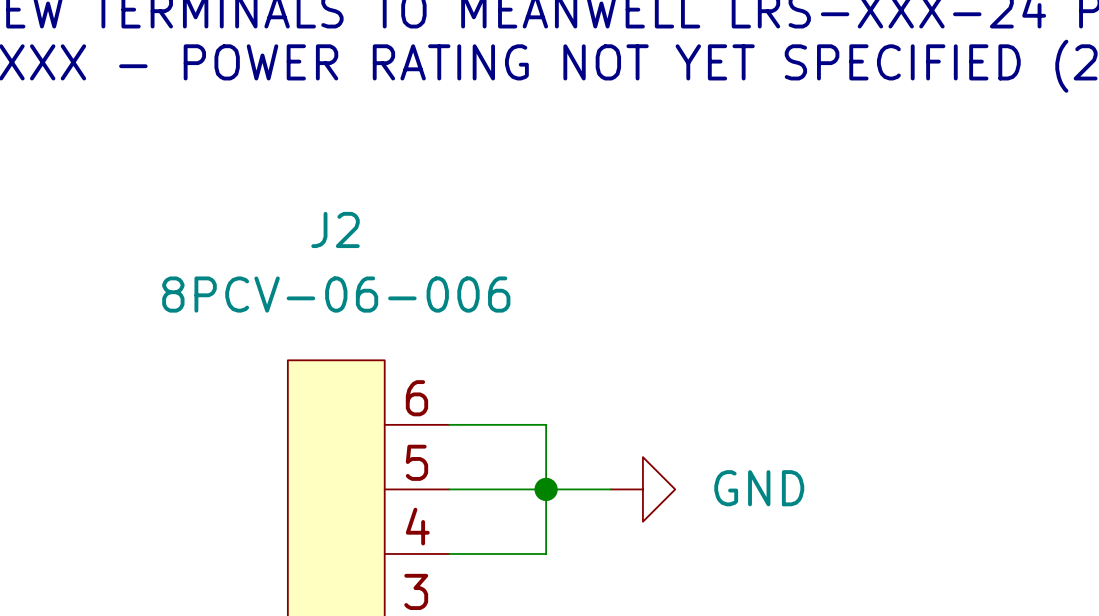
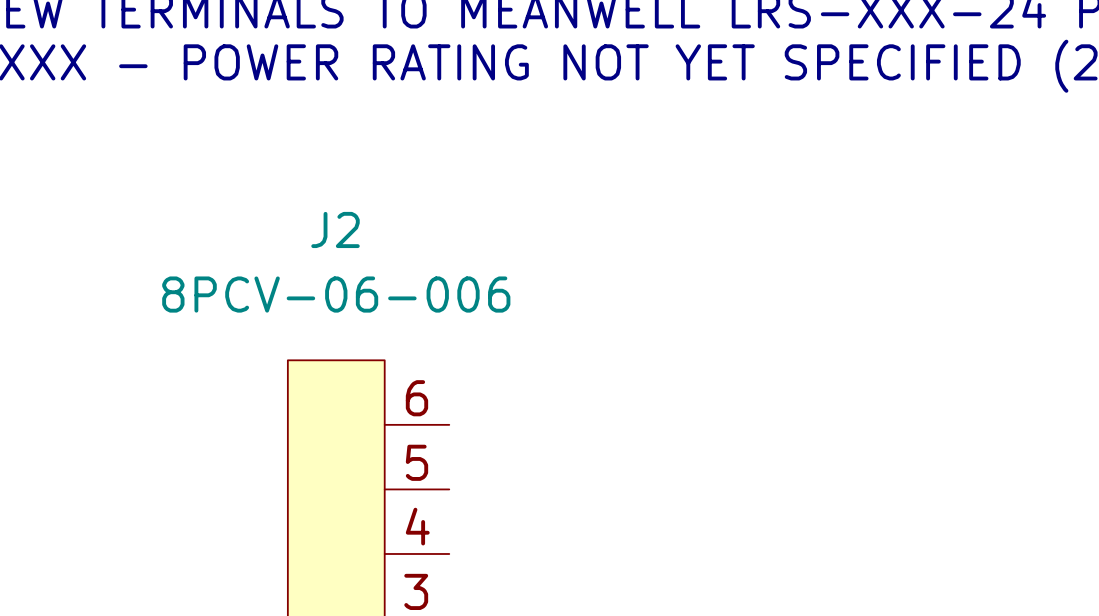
wire: (449, 424) (546, 424) (546, 553) (449, 553) -> none
wire: (449, 489) (610, 489) -> none
junction: (546, 489) -> none
power symbol: GND (642, 489) -> none

